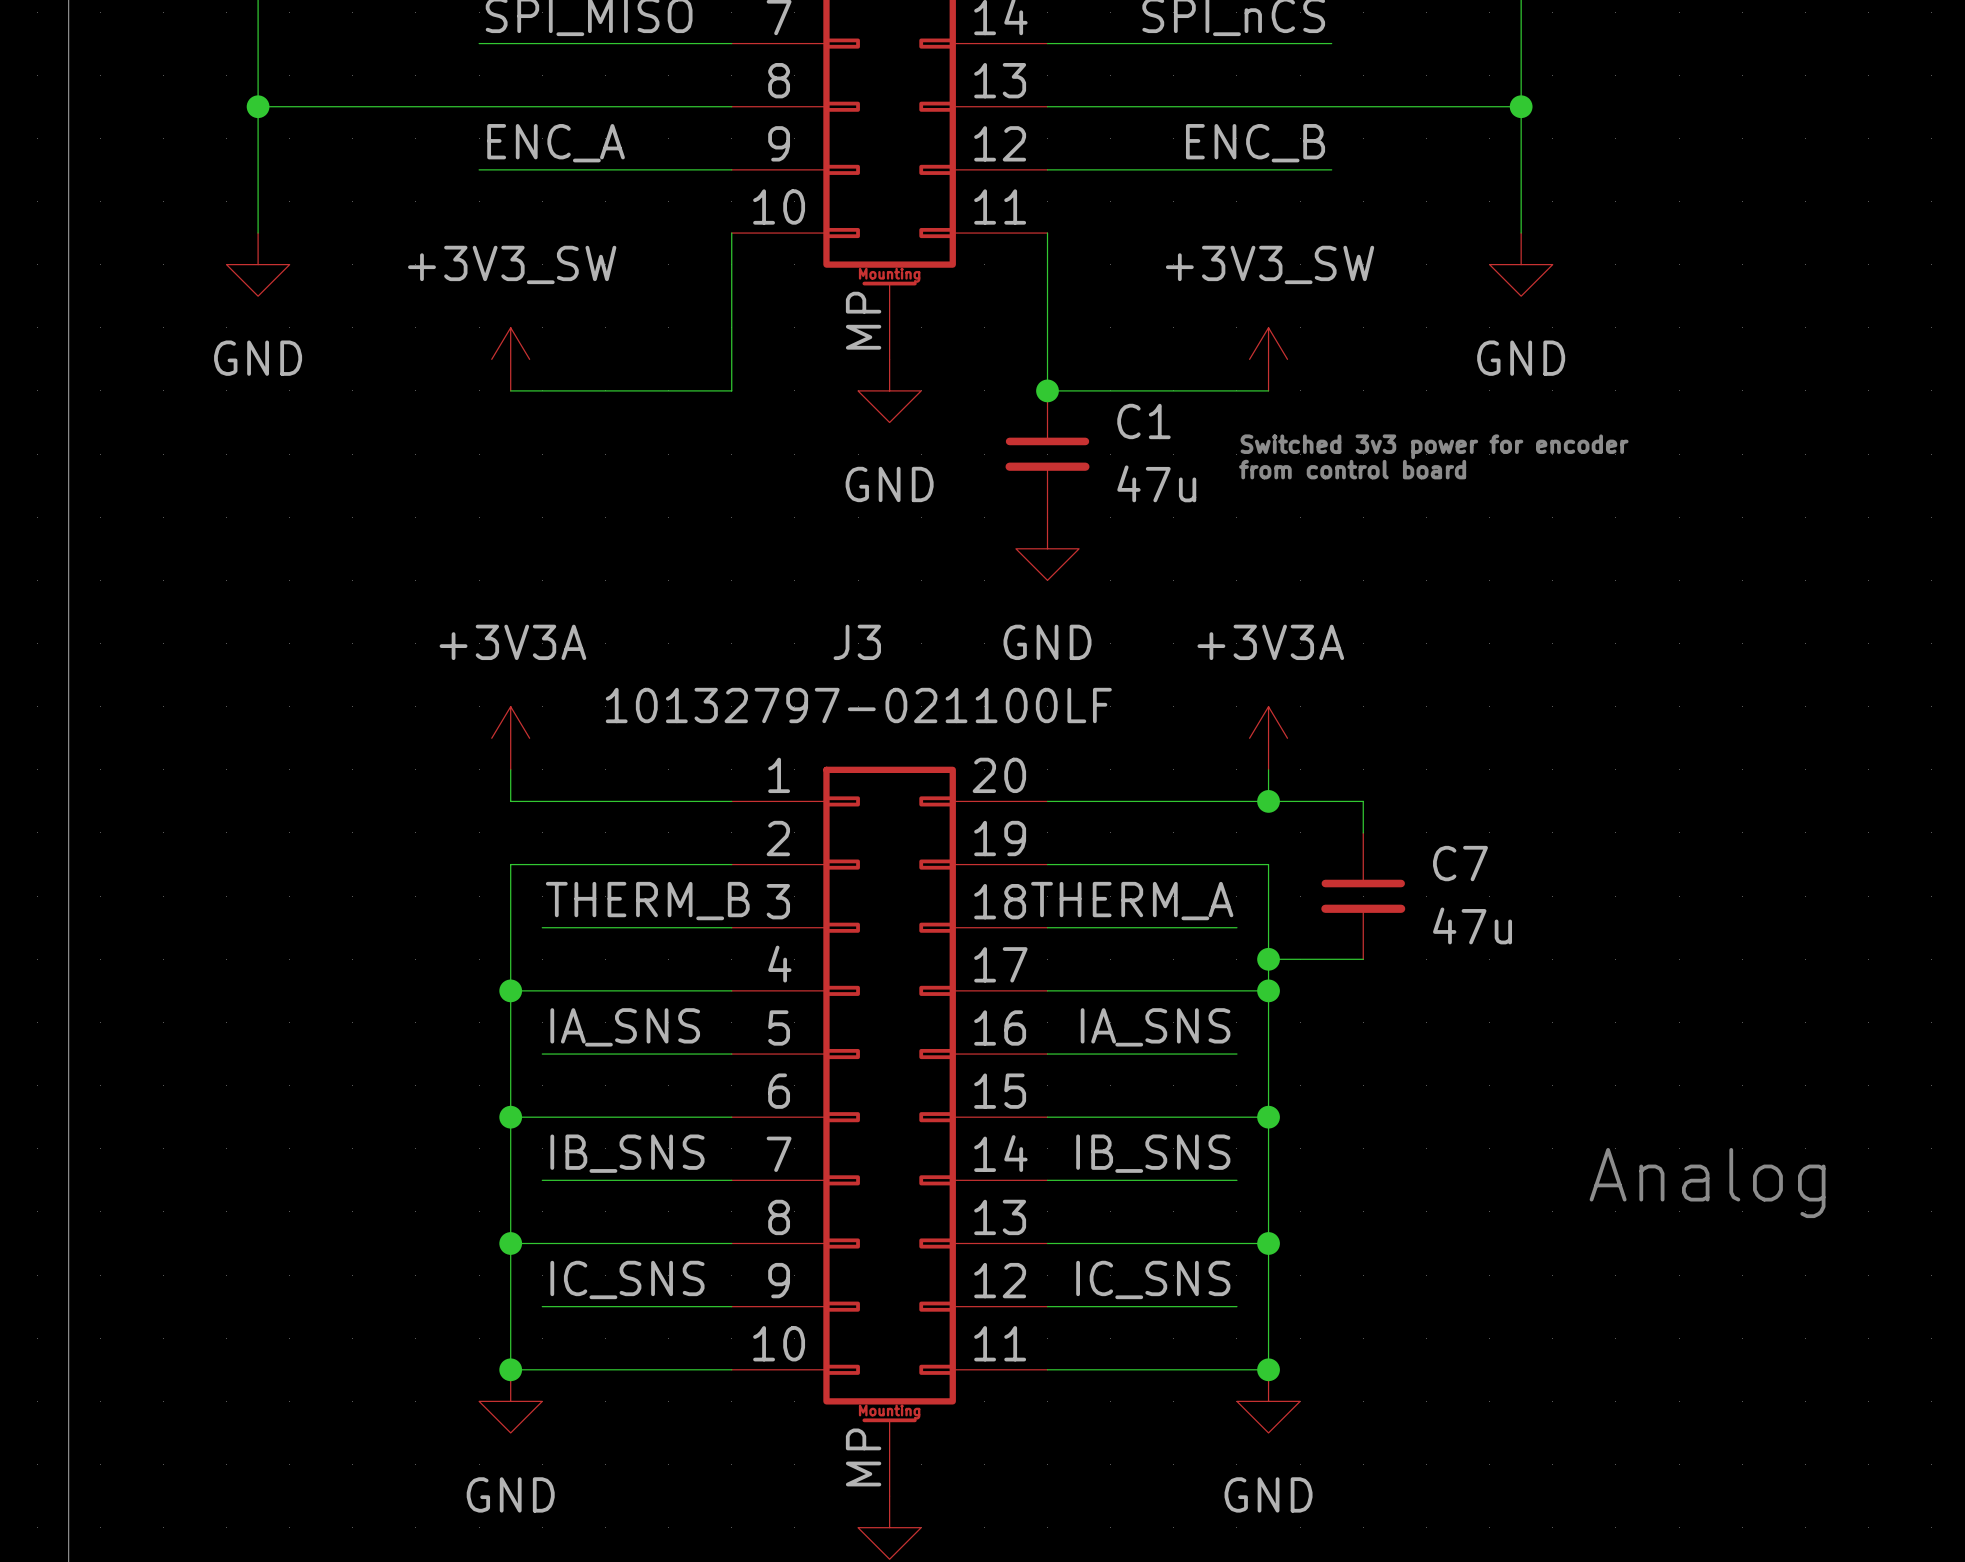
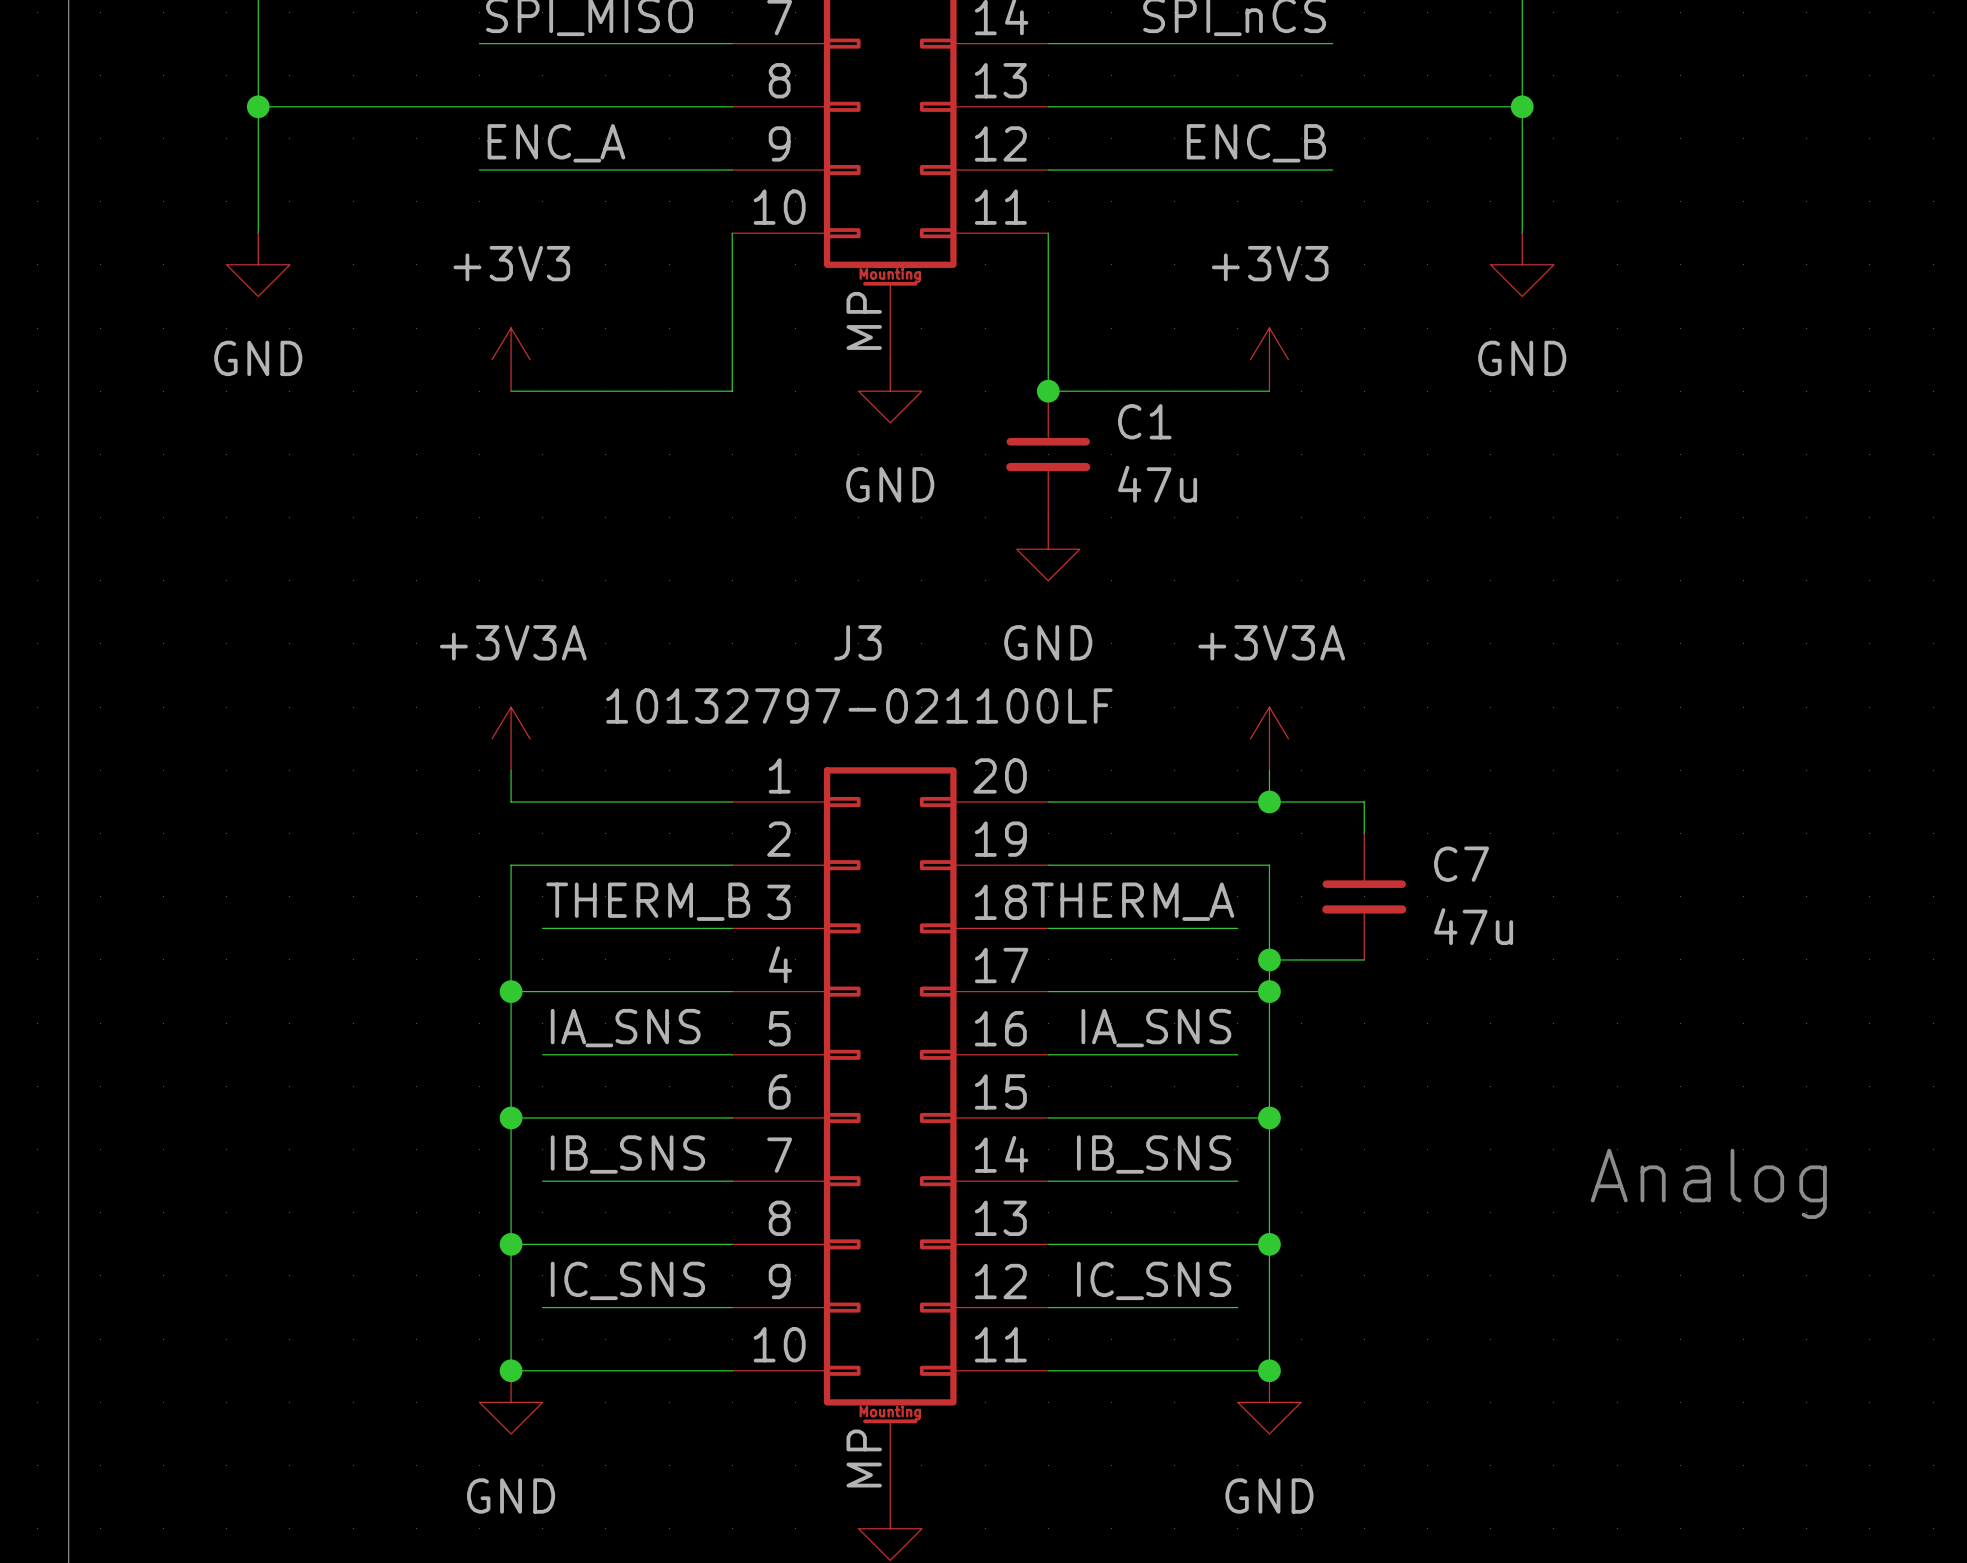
power symbol: +3V3_SW (510, 359) -> +3V3 (511, 359)
power symbol: +3V3_SW (1268, 359) -> +3V3 (1269, 359)
text: Switched 3v3 power for encoder (1434, 446) -> none
text: from control board (1352, 469) -> none

